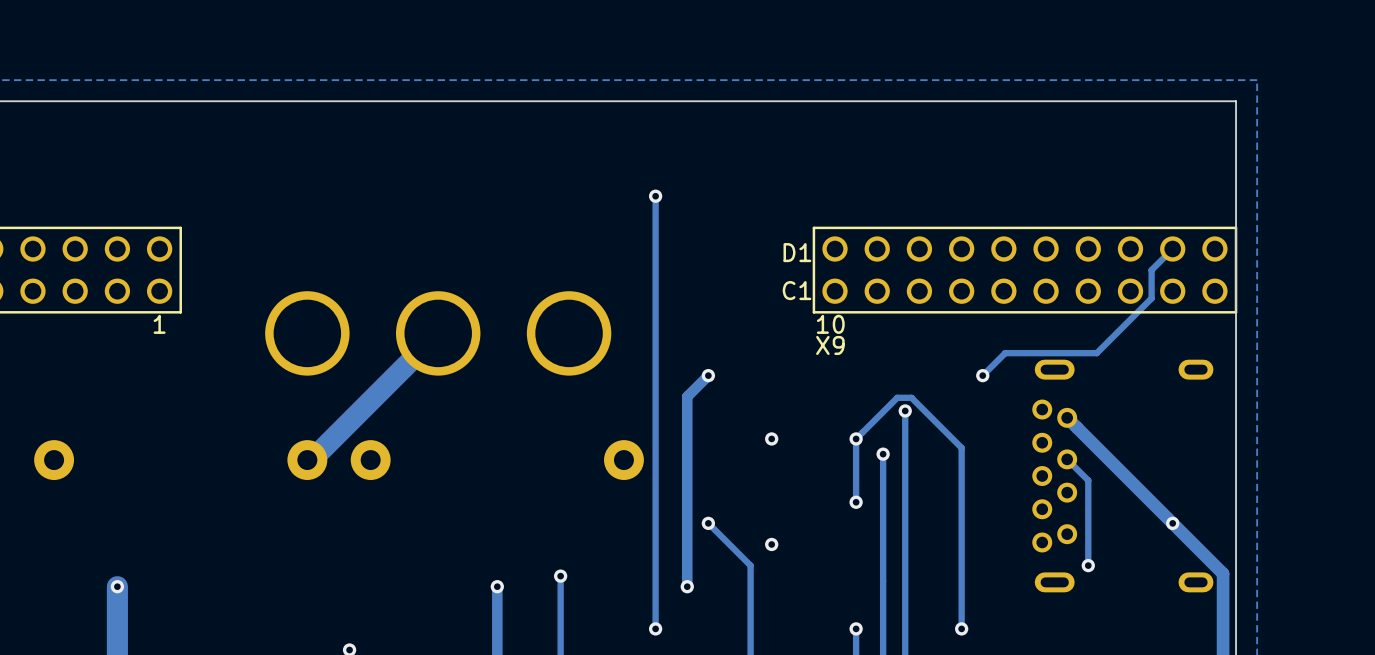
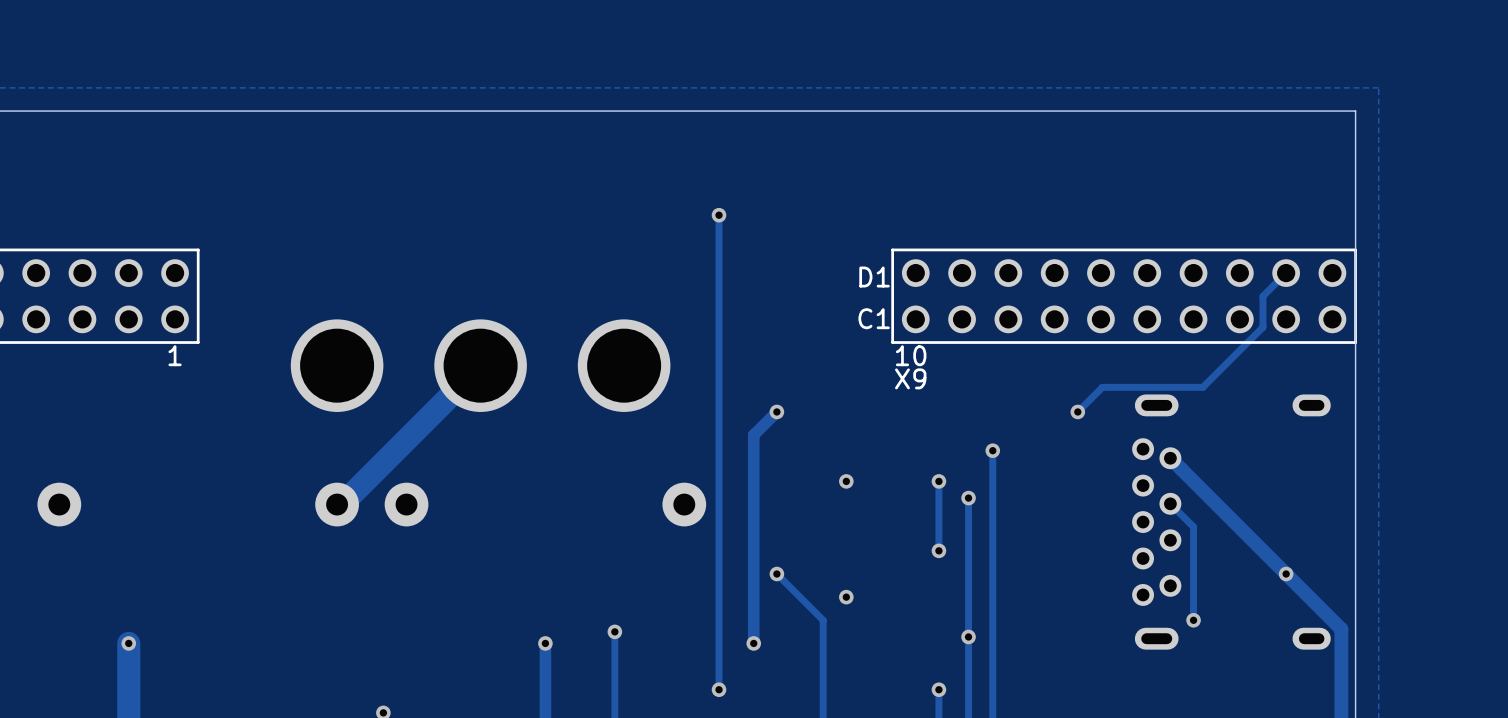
track: (856, 438) (897, 397) (911, 397) (961, 447) (961, 628) -> none
via position: (961, 628) -> (968, 636)

